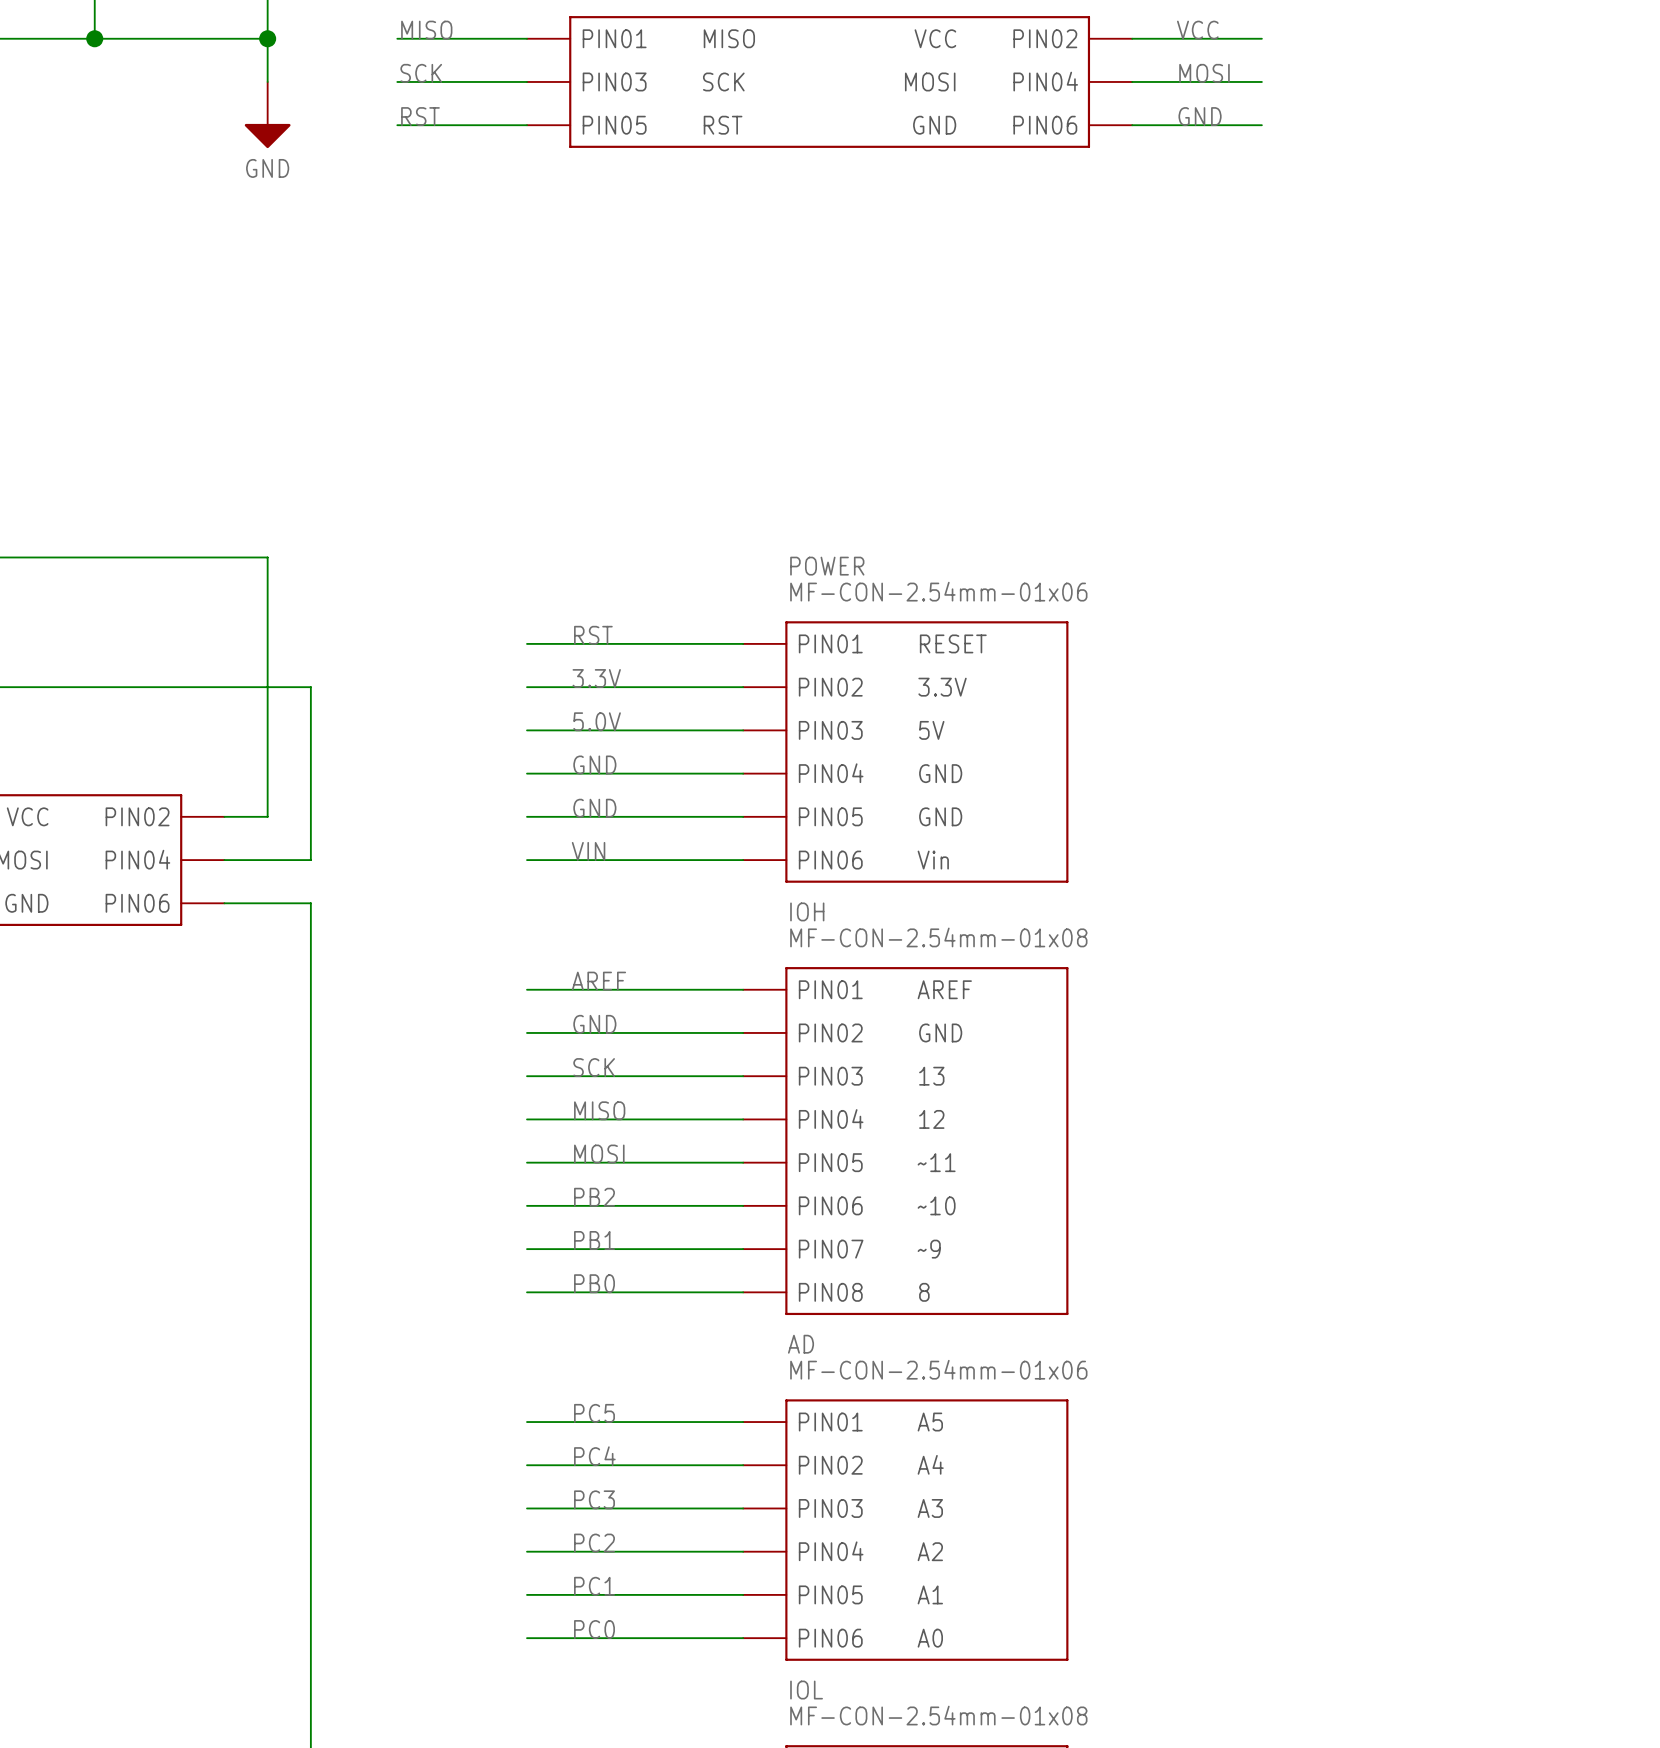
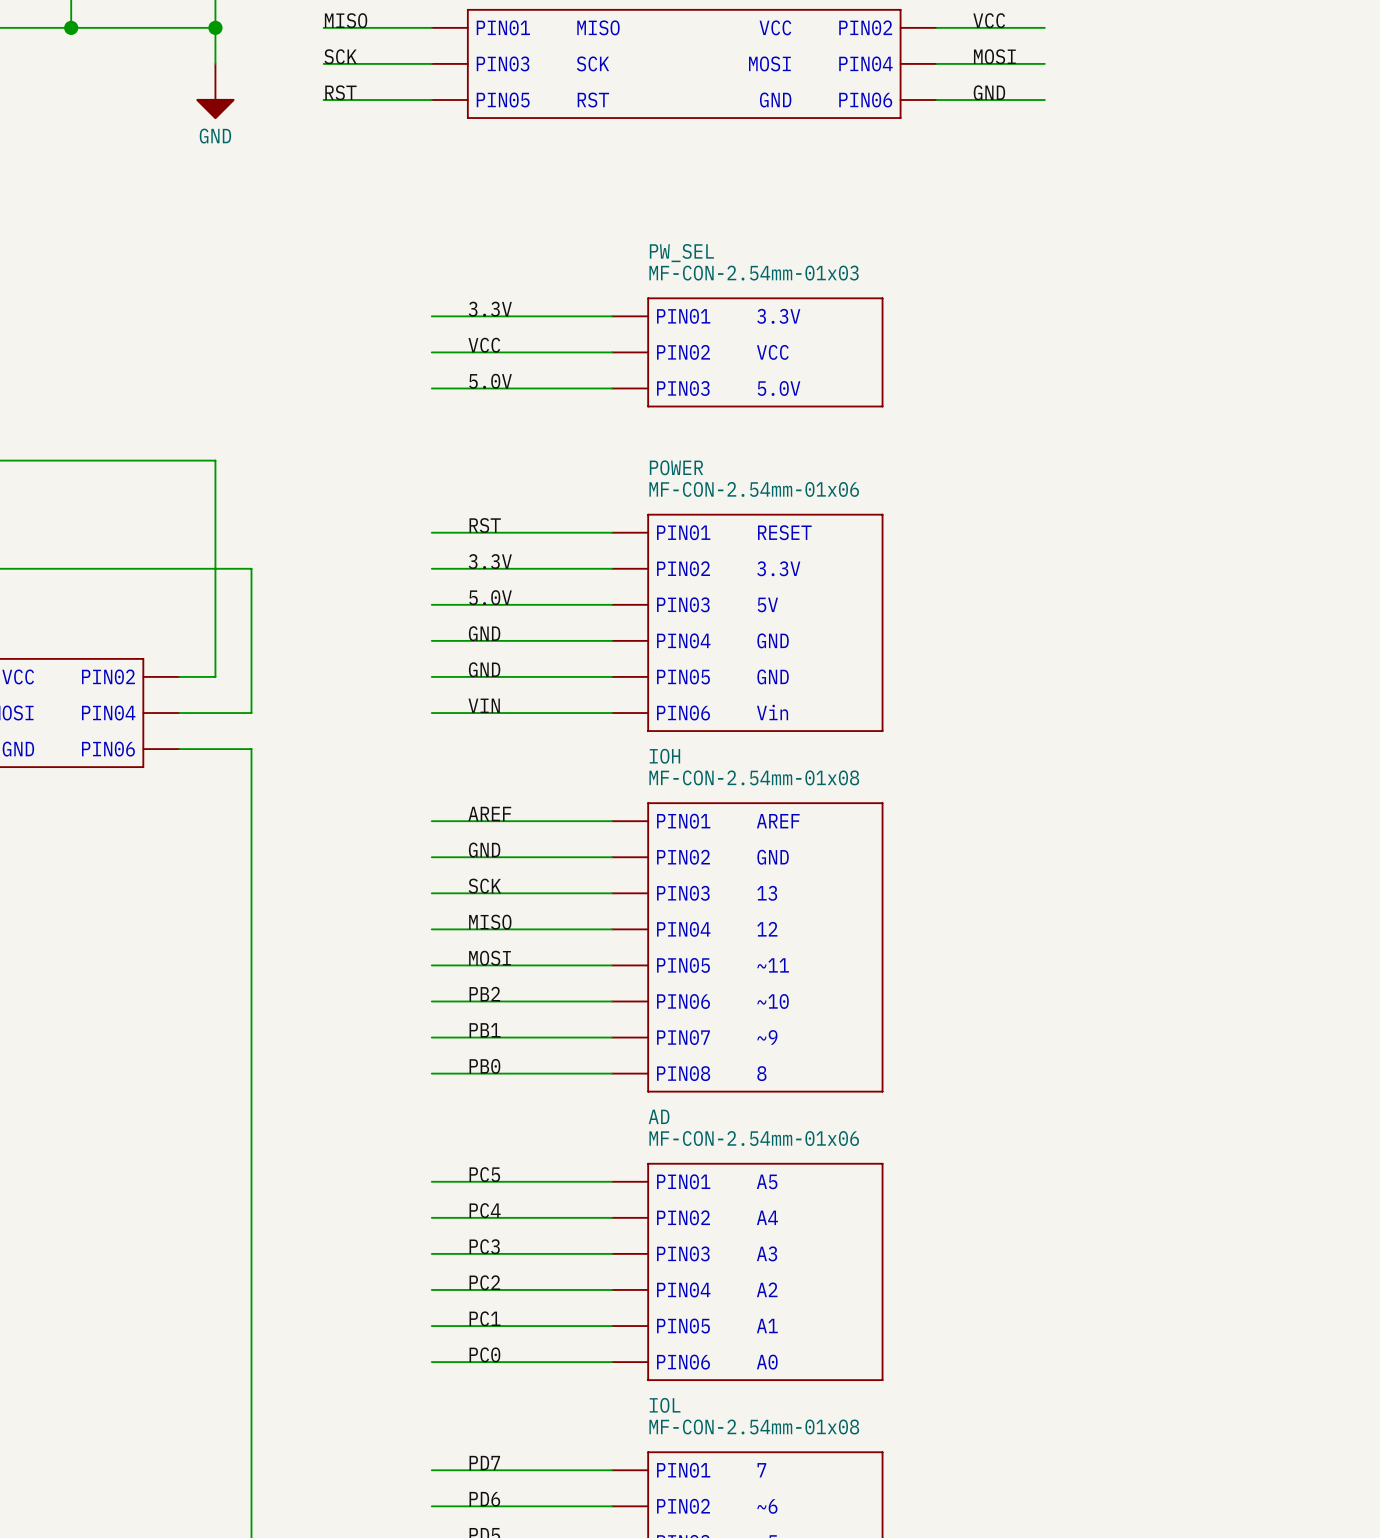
label: none -> 3.3V (490, 309)
wire: none -> (431, 316) (612, 316)
label: none -> VCC (484, 345)
wire: none -> (431, 352) (612, 352)
PW_SEL: none -> MF-CON-2.54mm-01x03 (747, 352)
label: none -> 5.0V (490, 381)
wire: none -> (431, 388) (612, 388)

